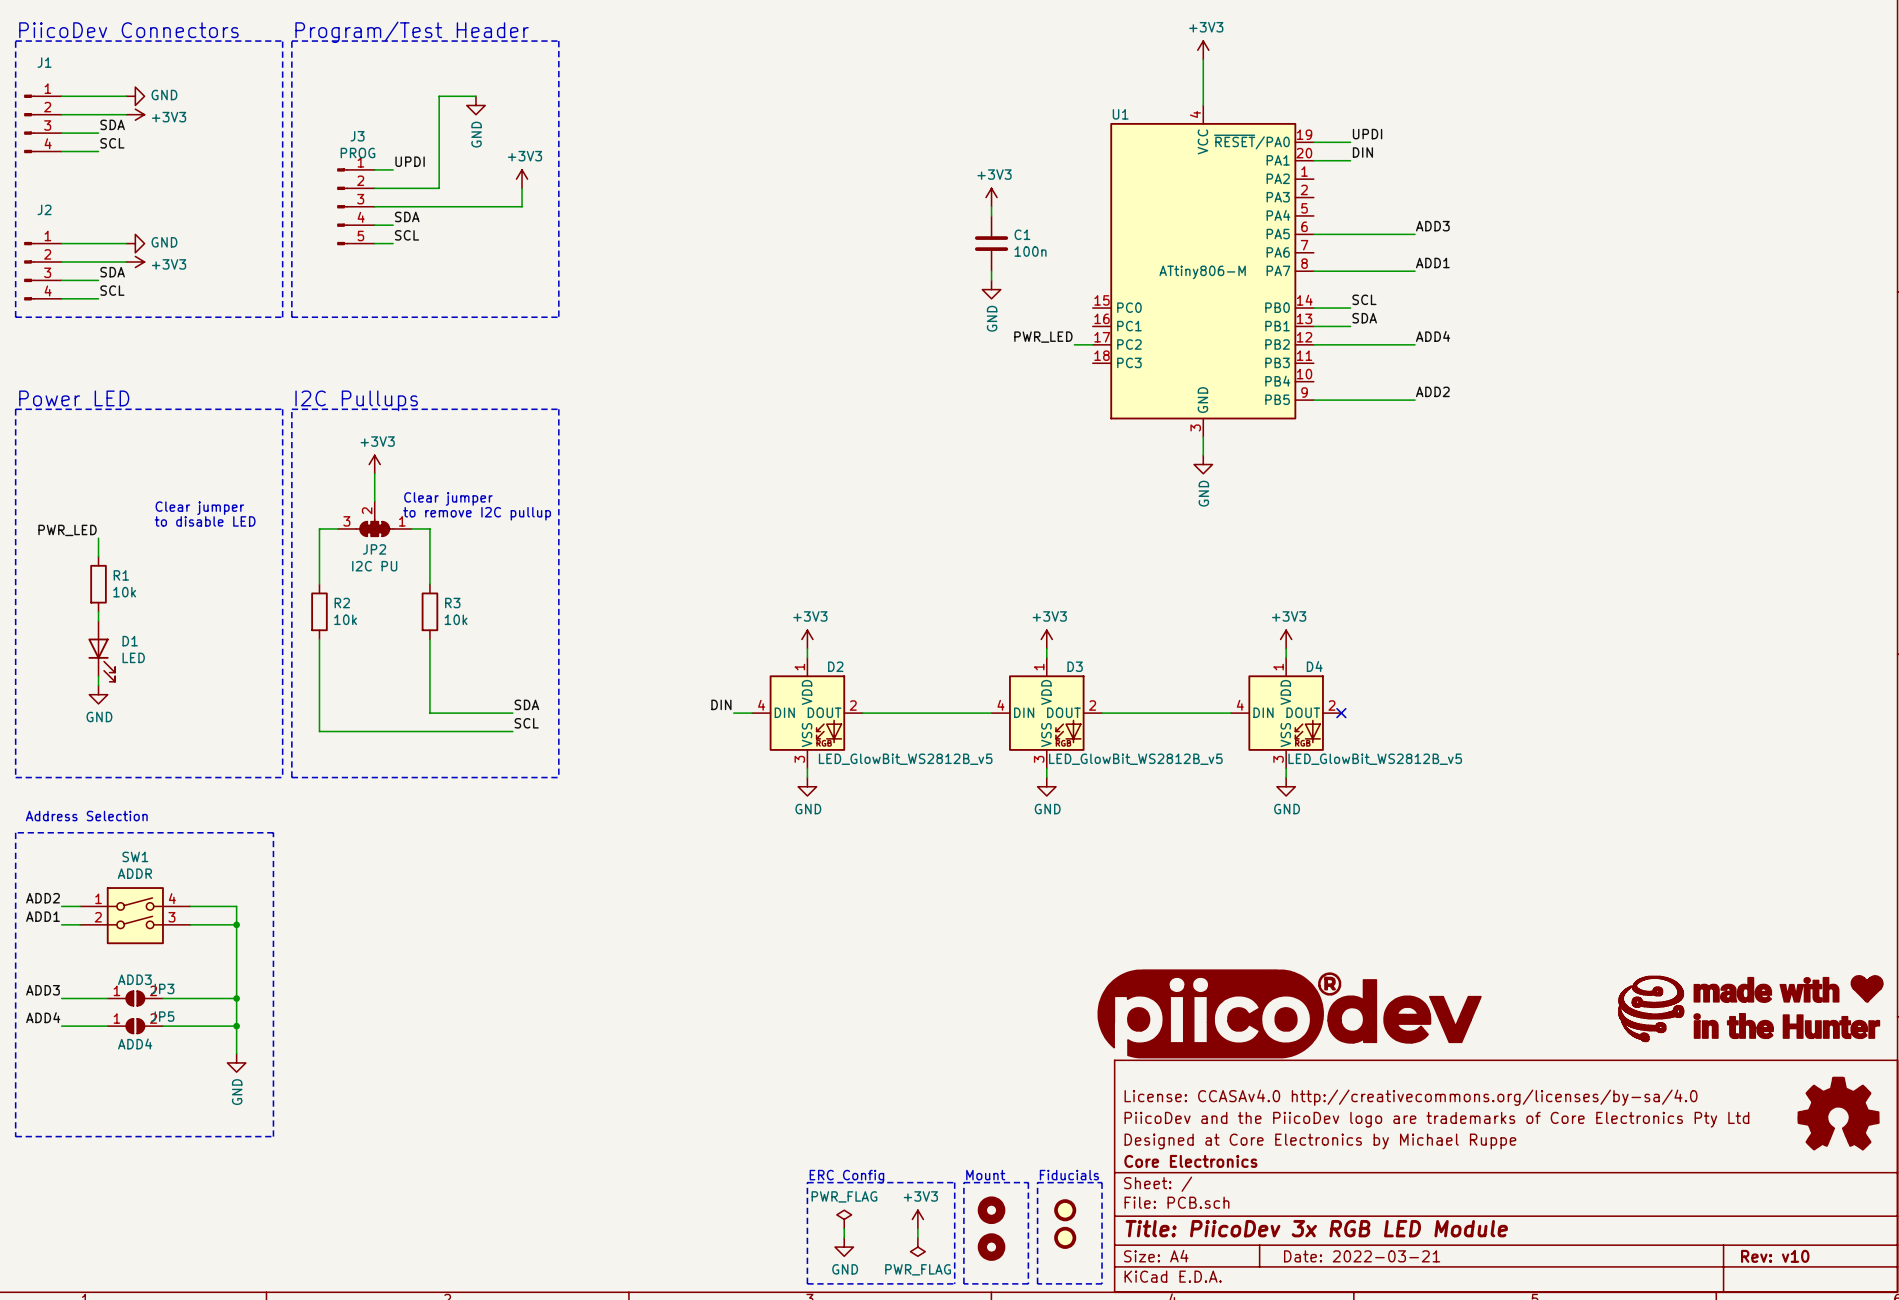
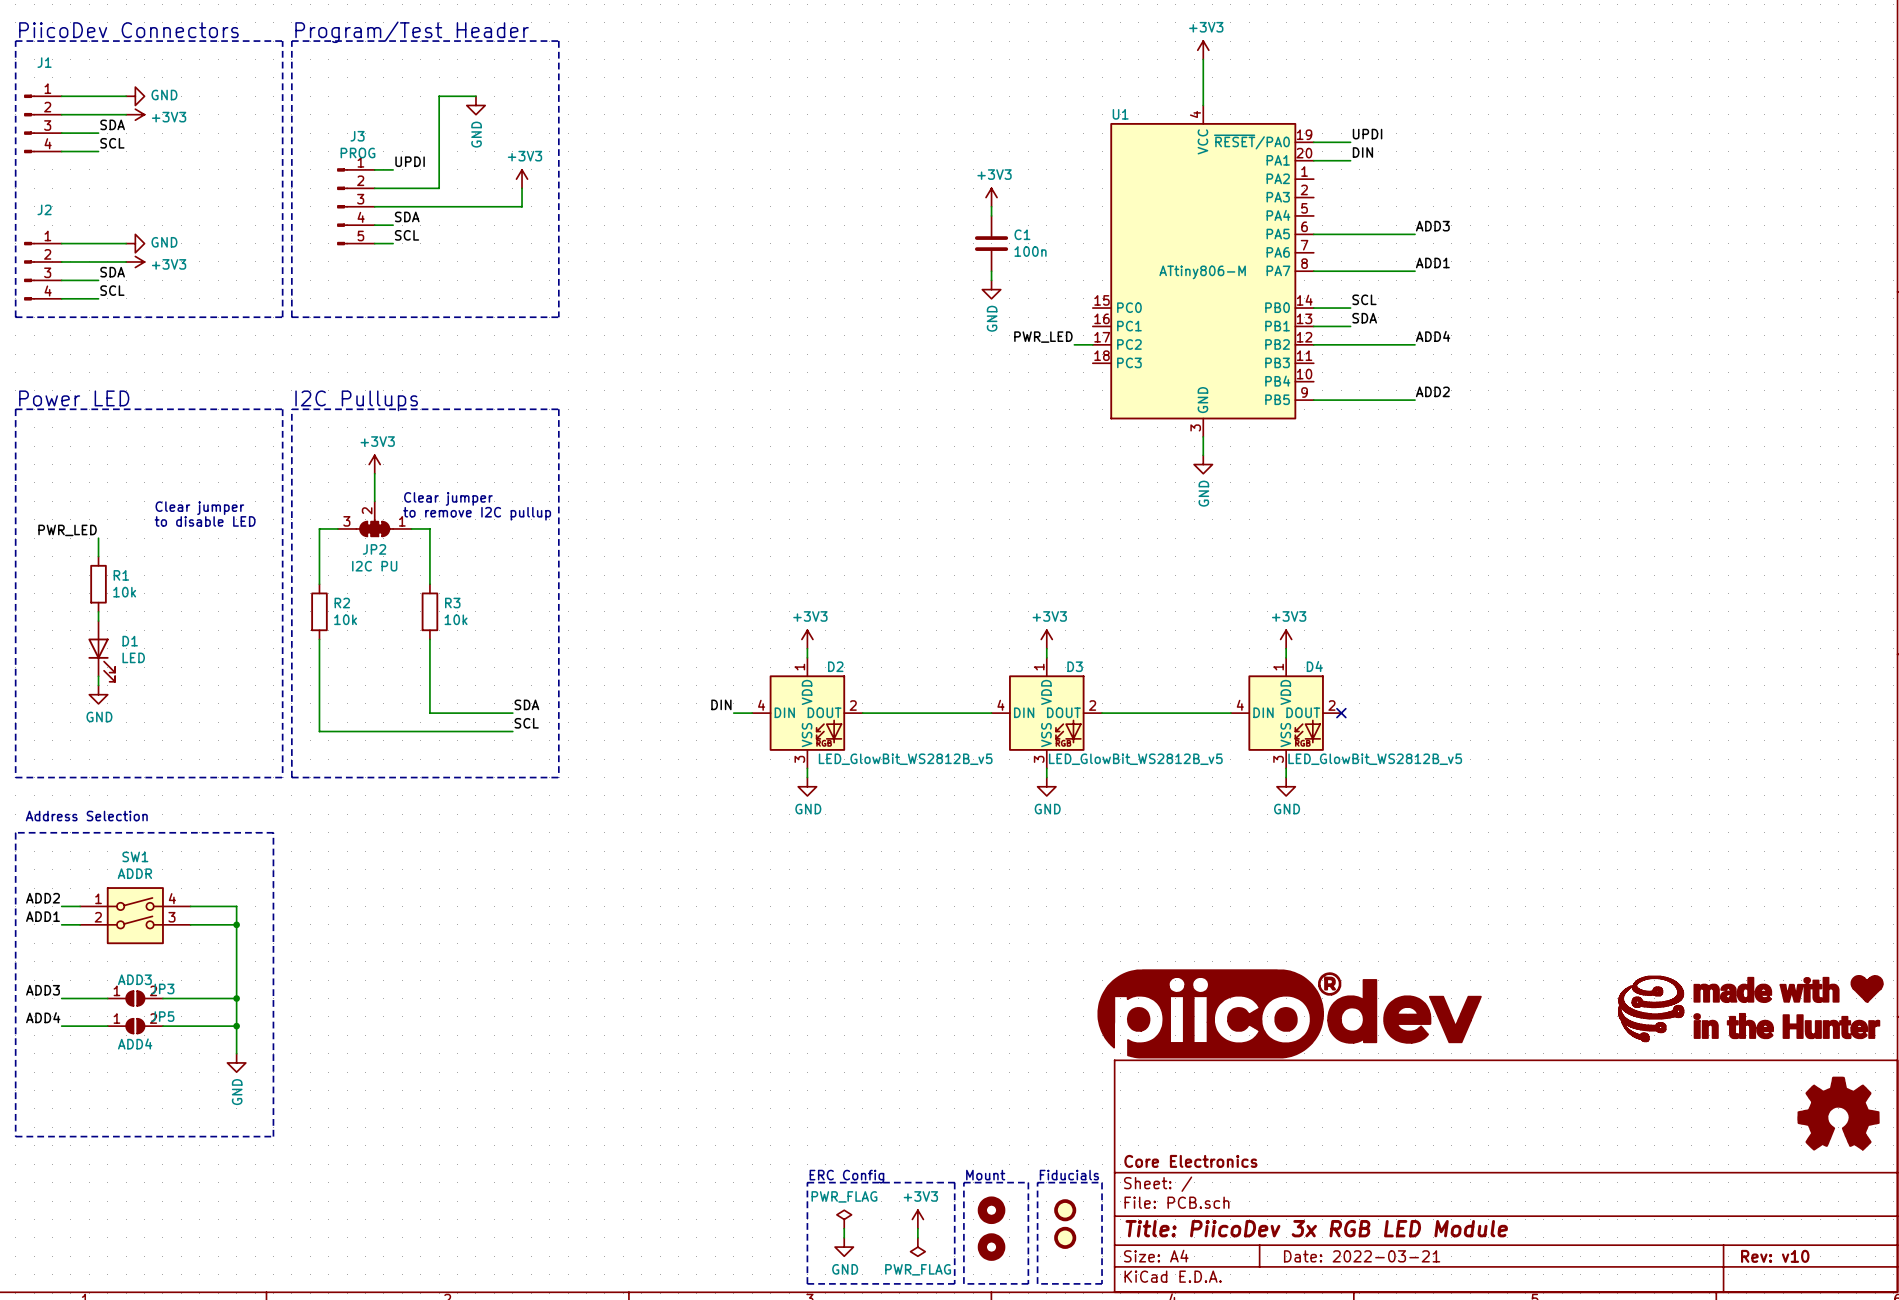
title block: License: CCASAv4.0 http://creativecommons.org/licenses/by-sa/4.0 (1411, 1097) -> none
title block: PiicoDev and the PiicoDev logo are trademarks of Core Electronics Pty Ltd (1436, 1119) -> none
title block: Designed at Core Electronics by Michael Ruppe (1320, 1141) -> none

